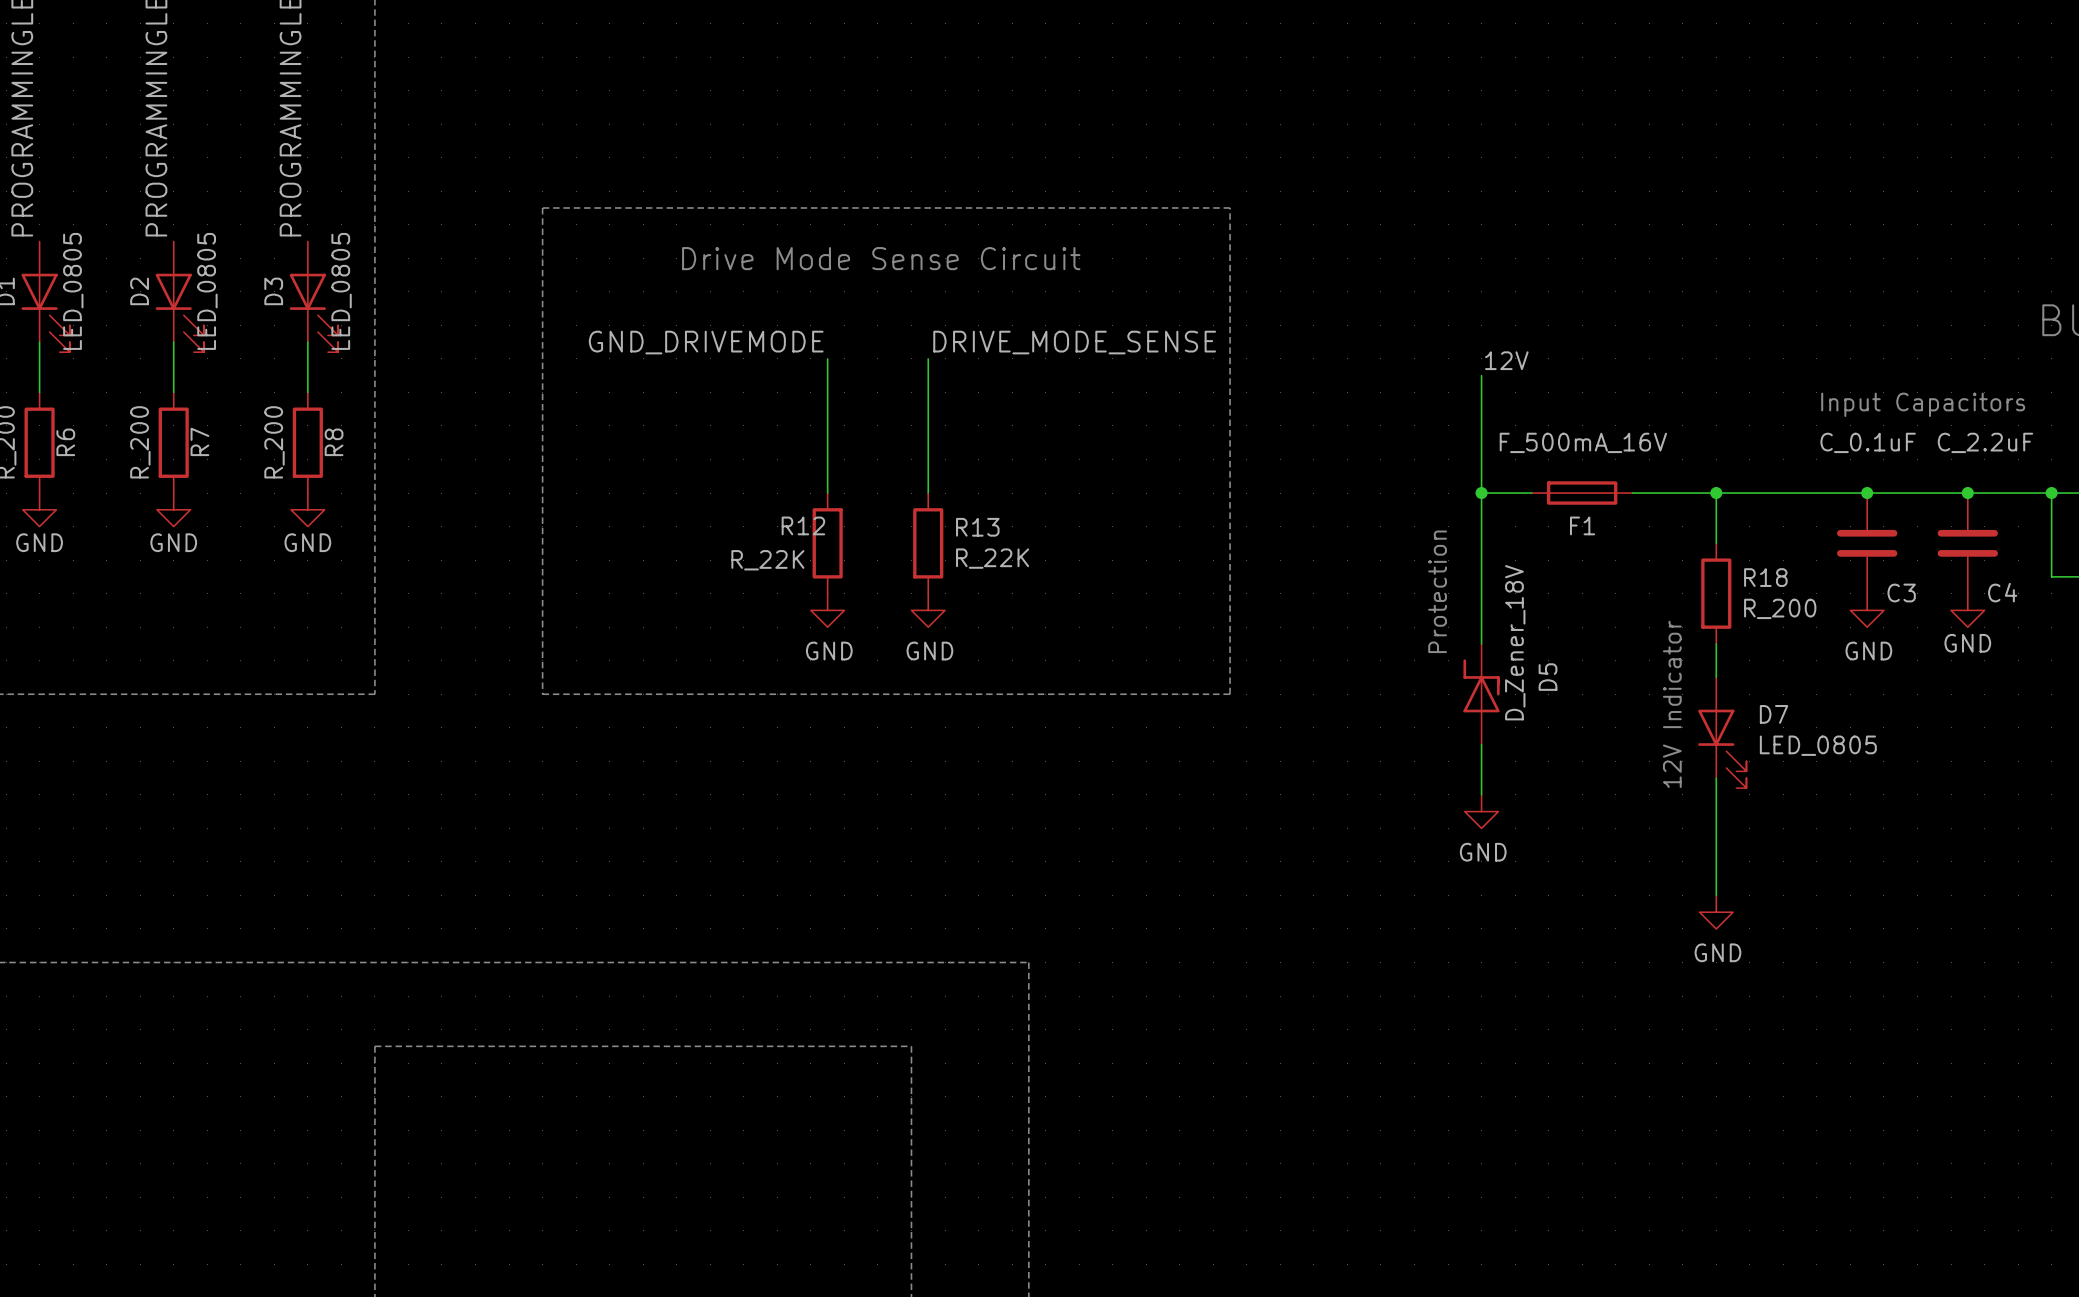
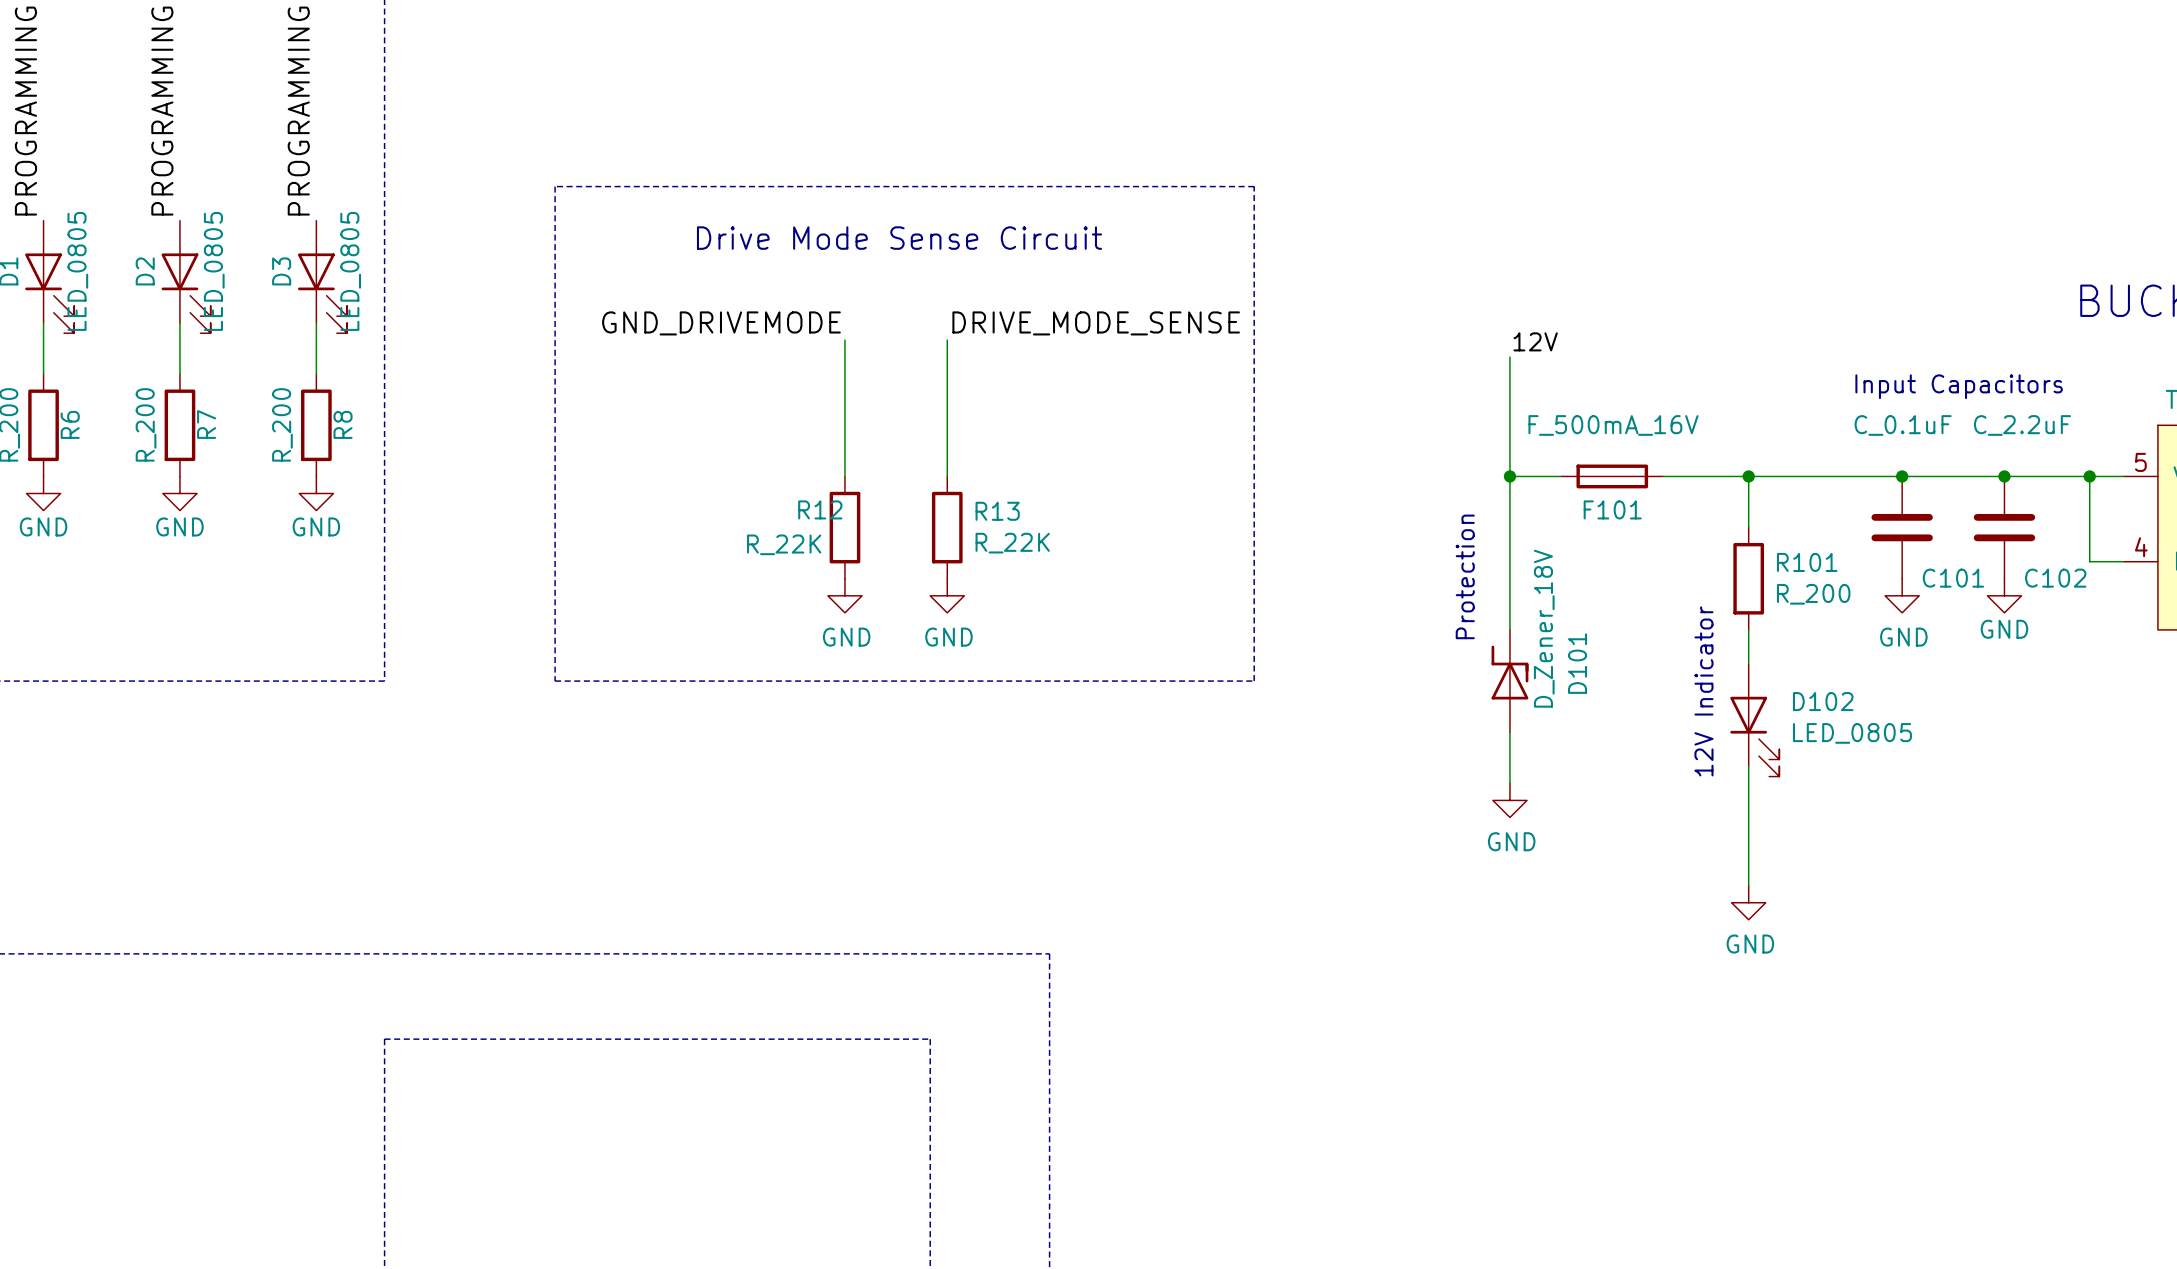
F1 name: F1 (1582, 525) -> F101 (1612, 509)
R18 name: R18 (1765, 577) -> R101 (1807, 562)
C4 name: C4 (2002, 592) -> C102 (2055, 578)
C3 name: C3 (1901, 593) -> C101 (1953, 578)
D5 name: D5 (1547, 677) -> D101 (1577, 663)
D7 name: D7 (1774, 714) -> D102 (1823, 701)

